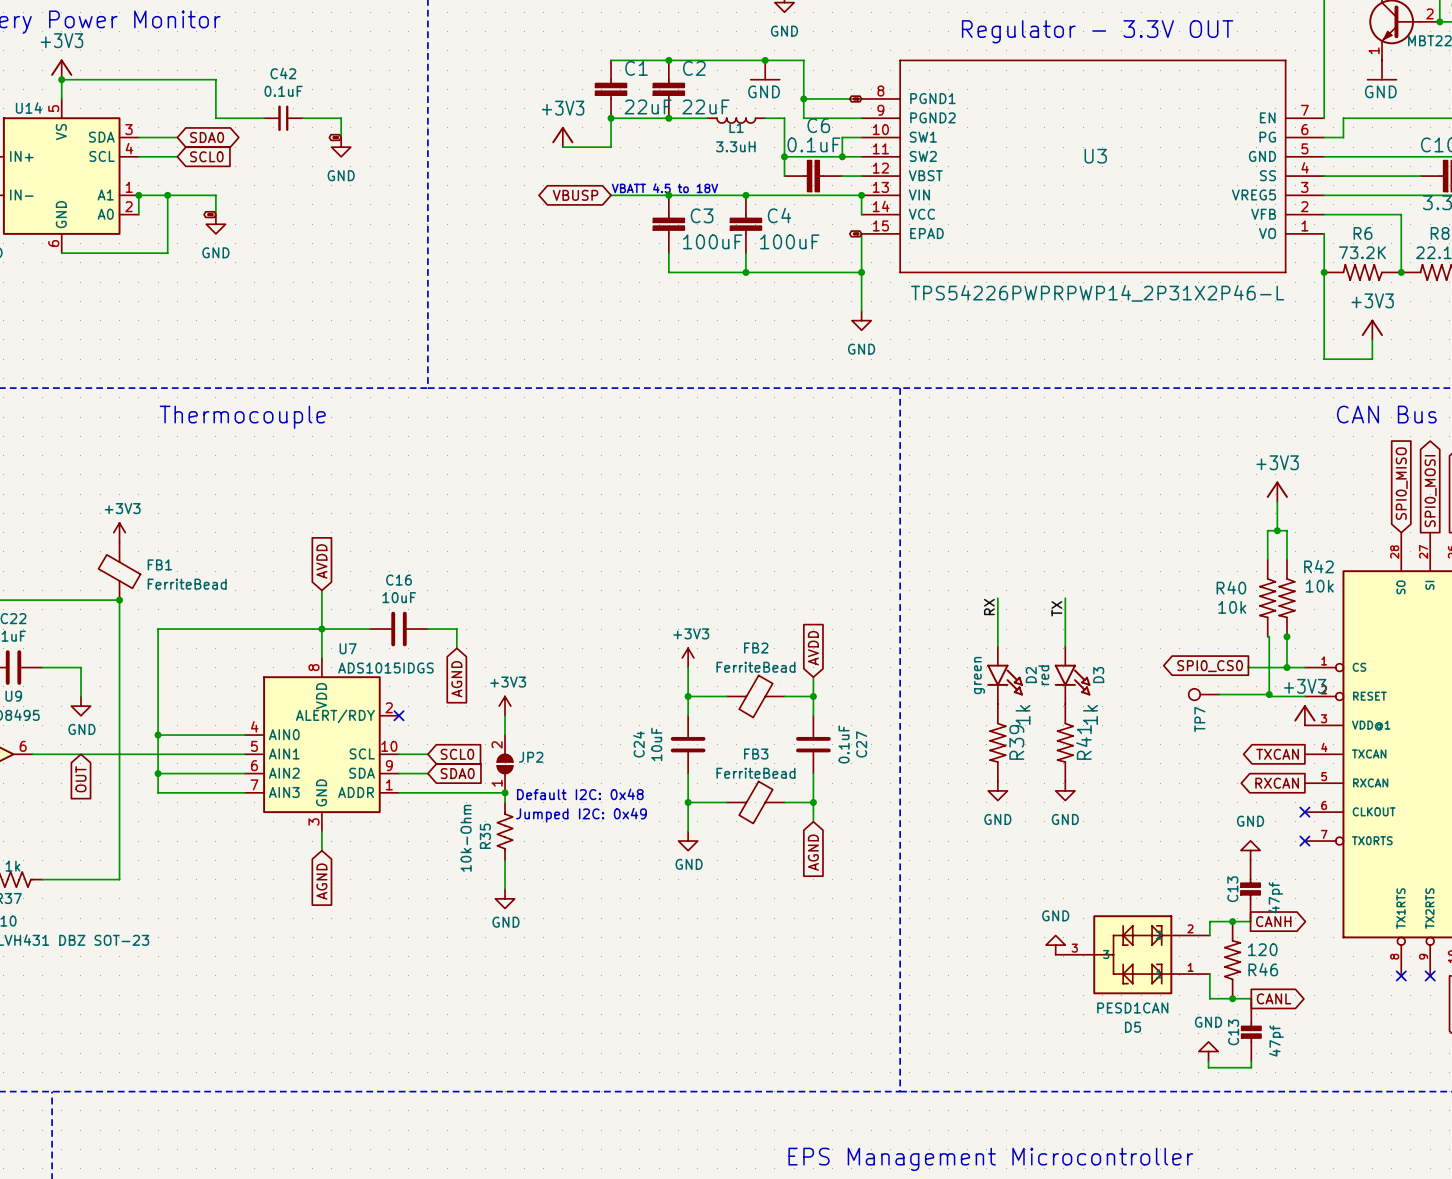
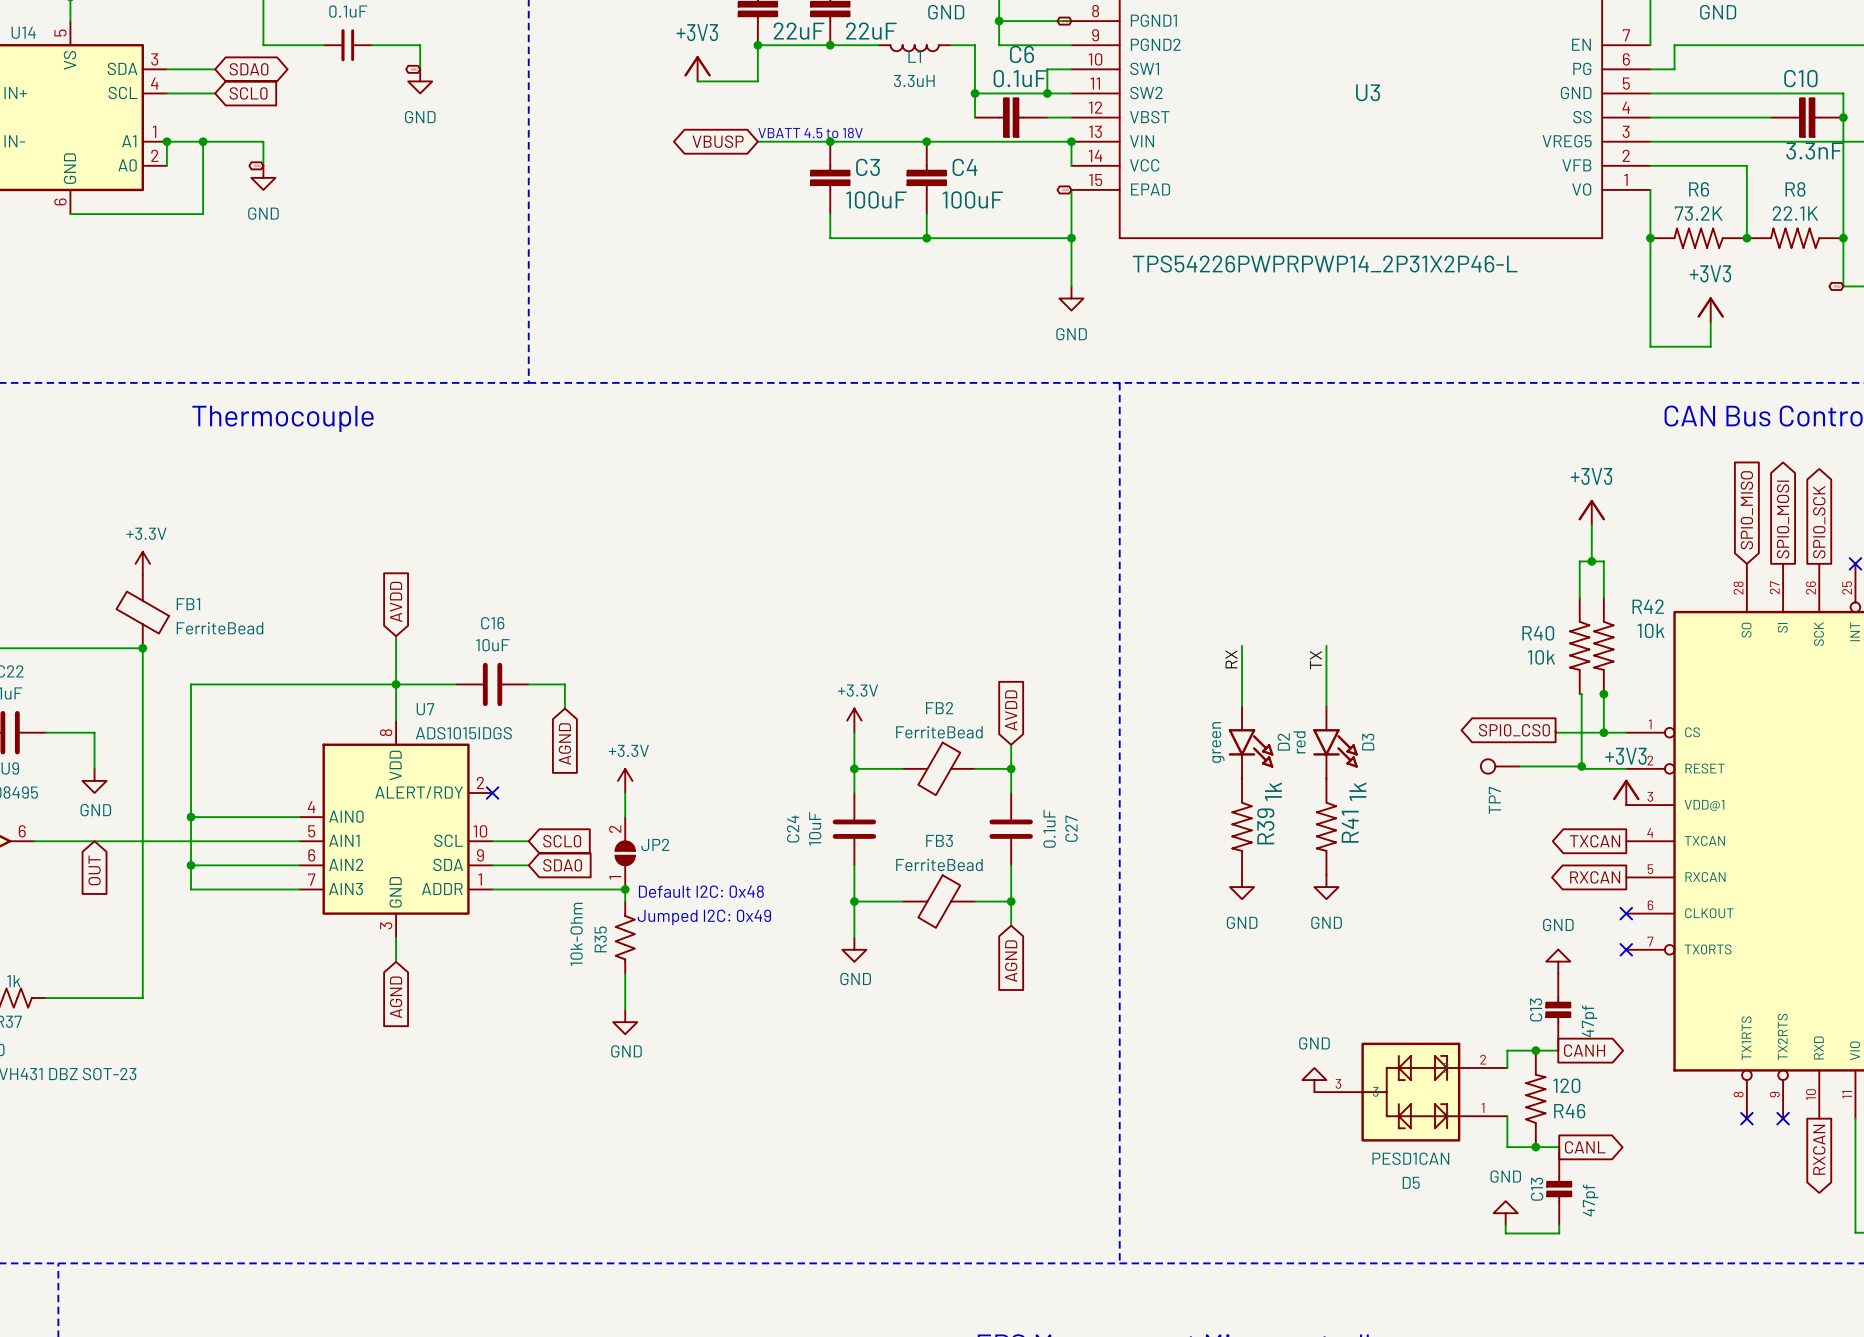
power symbol: +3V3 (119, 532) -> +3.3V (142, 563)
power symbol: +3V3 (688, 657) -> +3.3V (854, 720)
power symbol: +3V3 (505, 706) -> +3.3V (625, 780)

